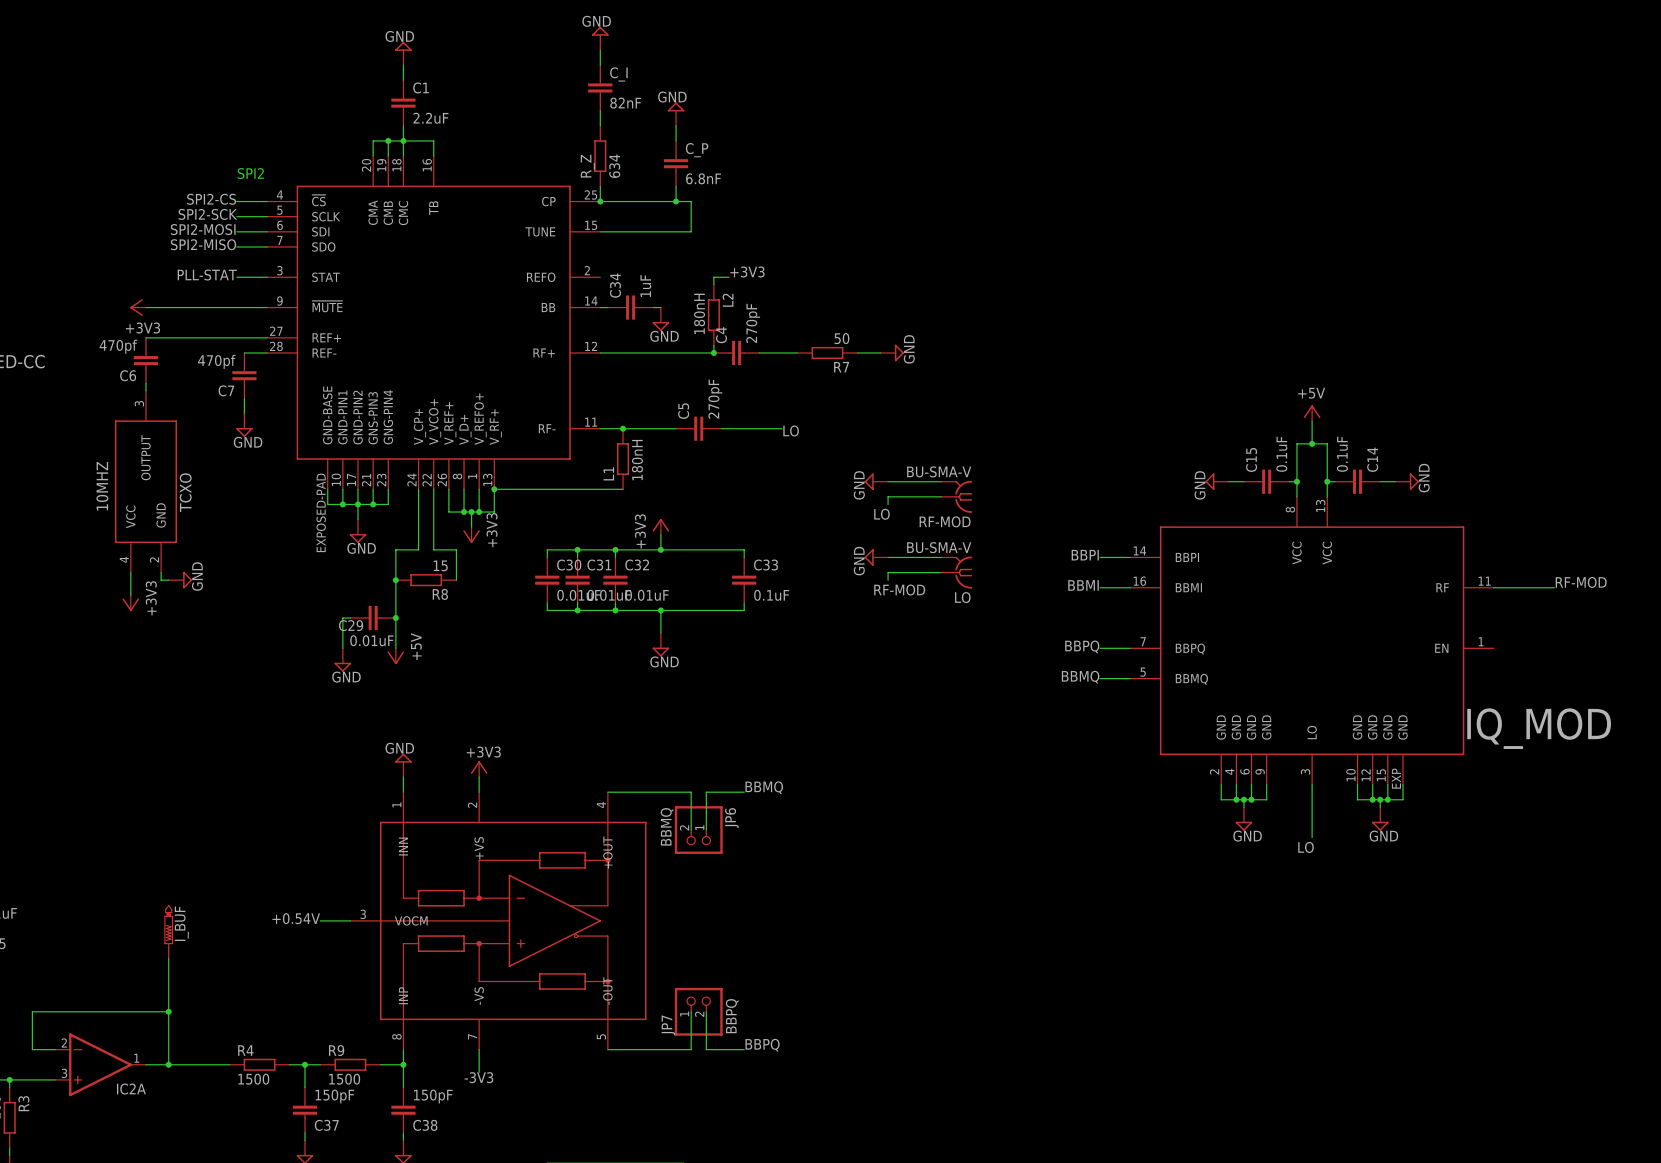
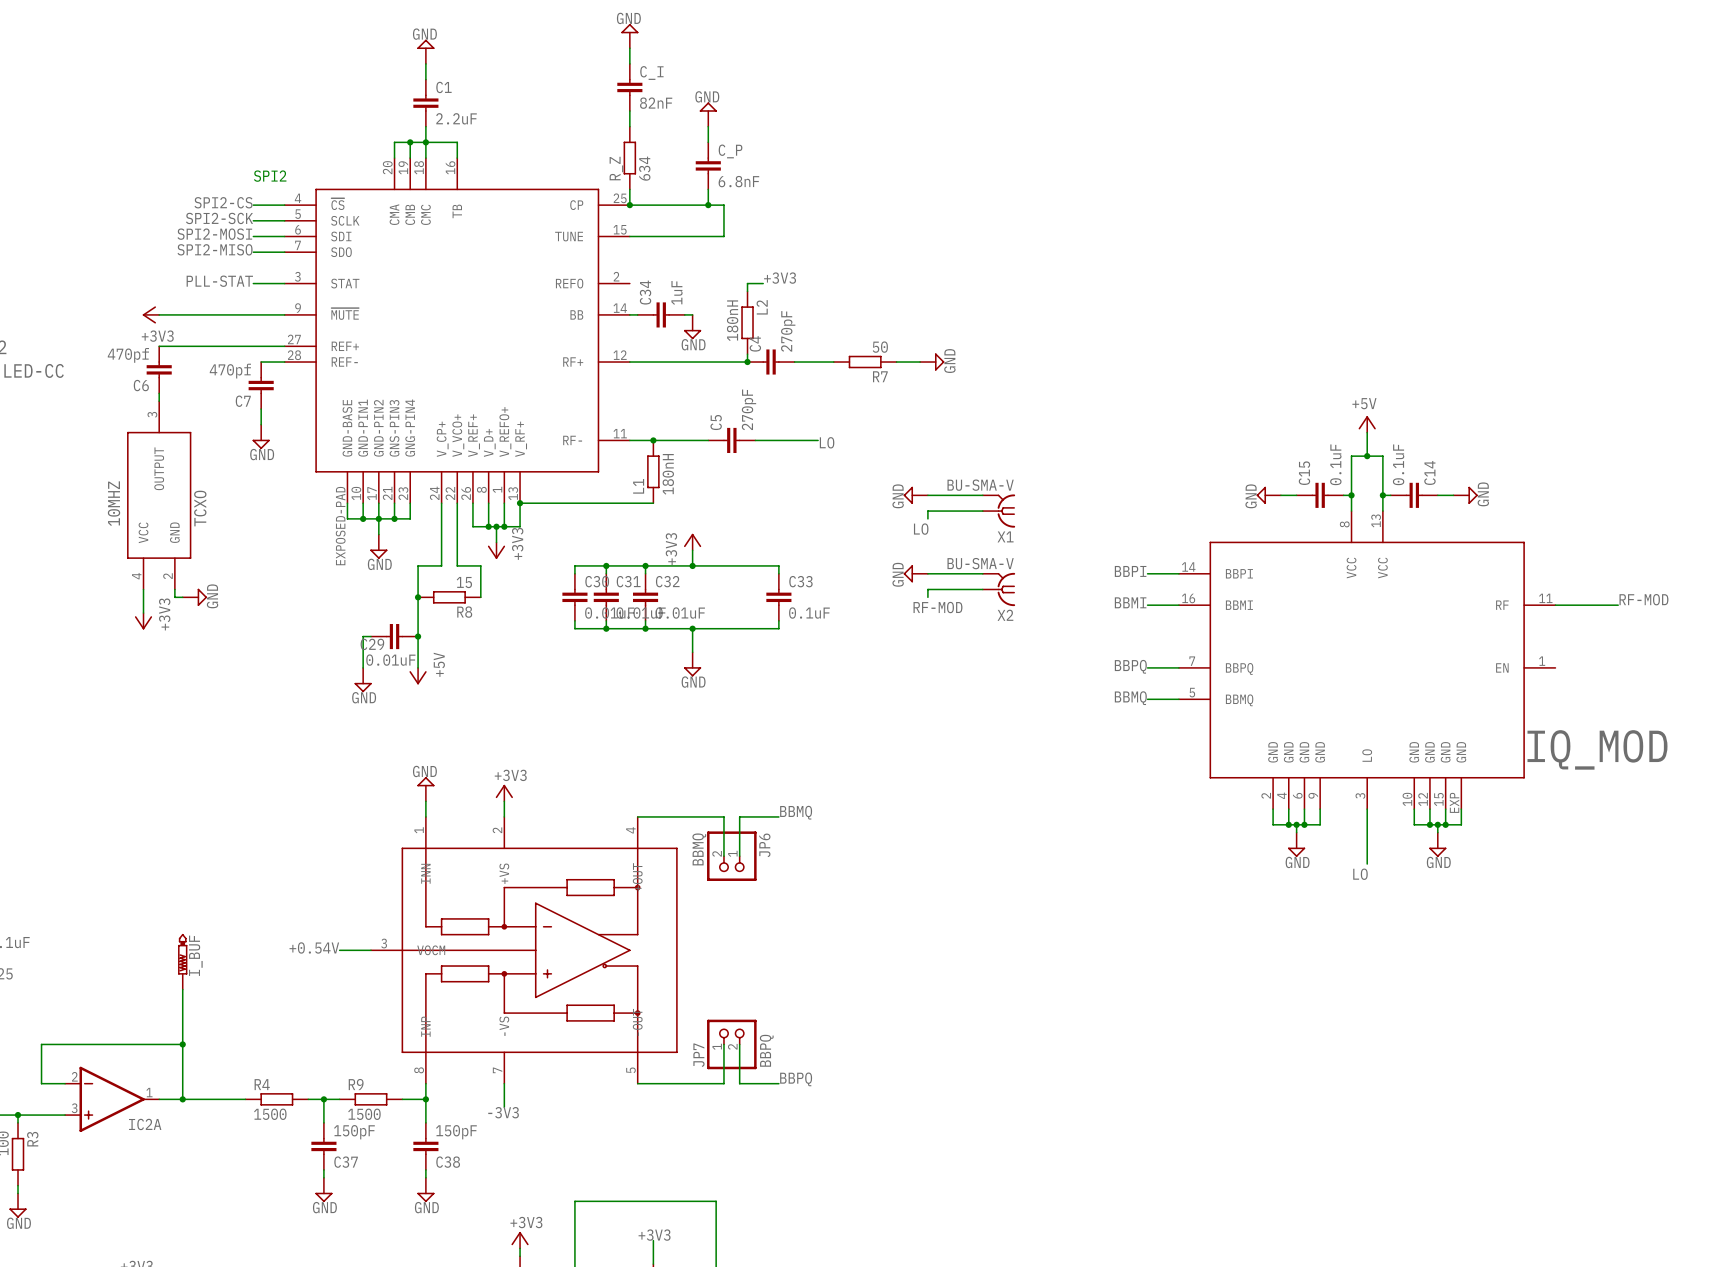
RF-MOD name: RF-MOD (945, 521) -> X1 (1005, 536)
LO name: LO (962, 597) -> X2 (1005, 615)

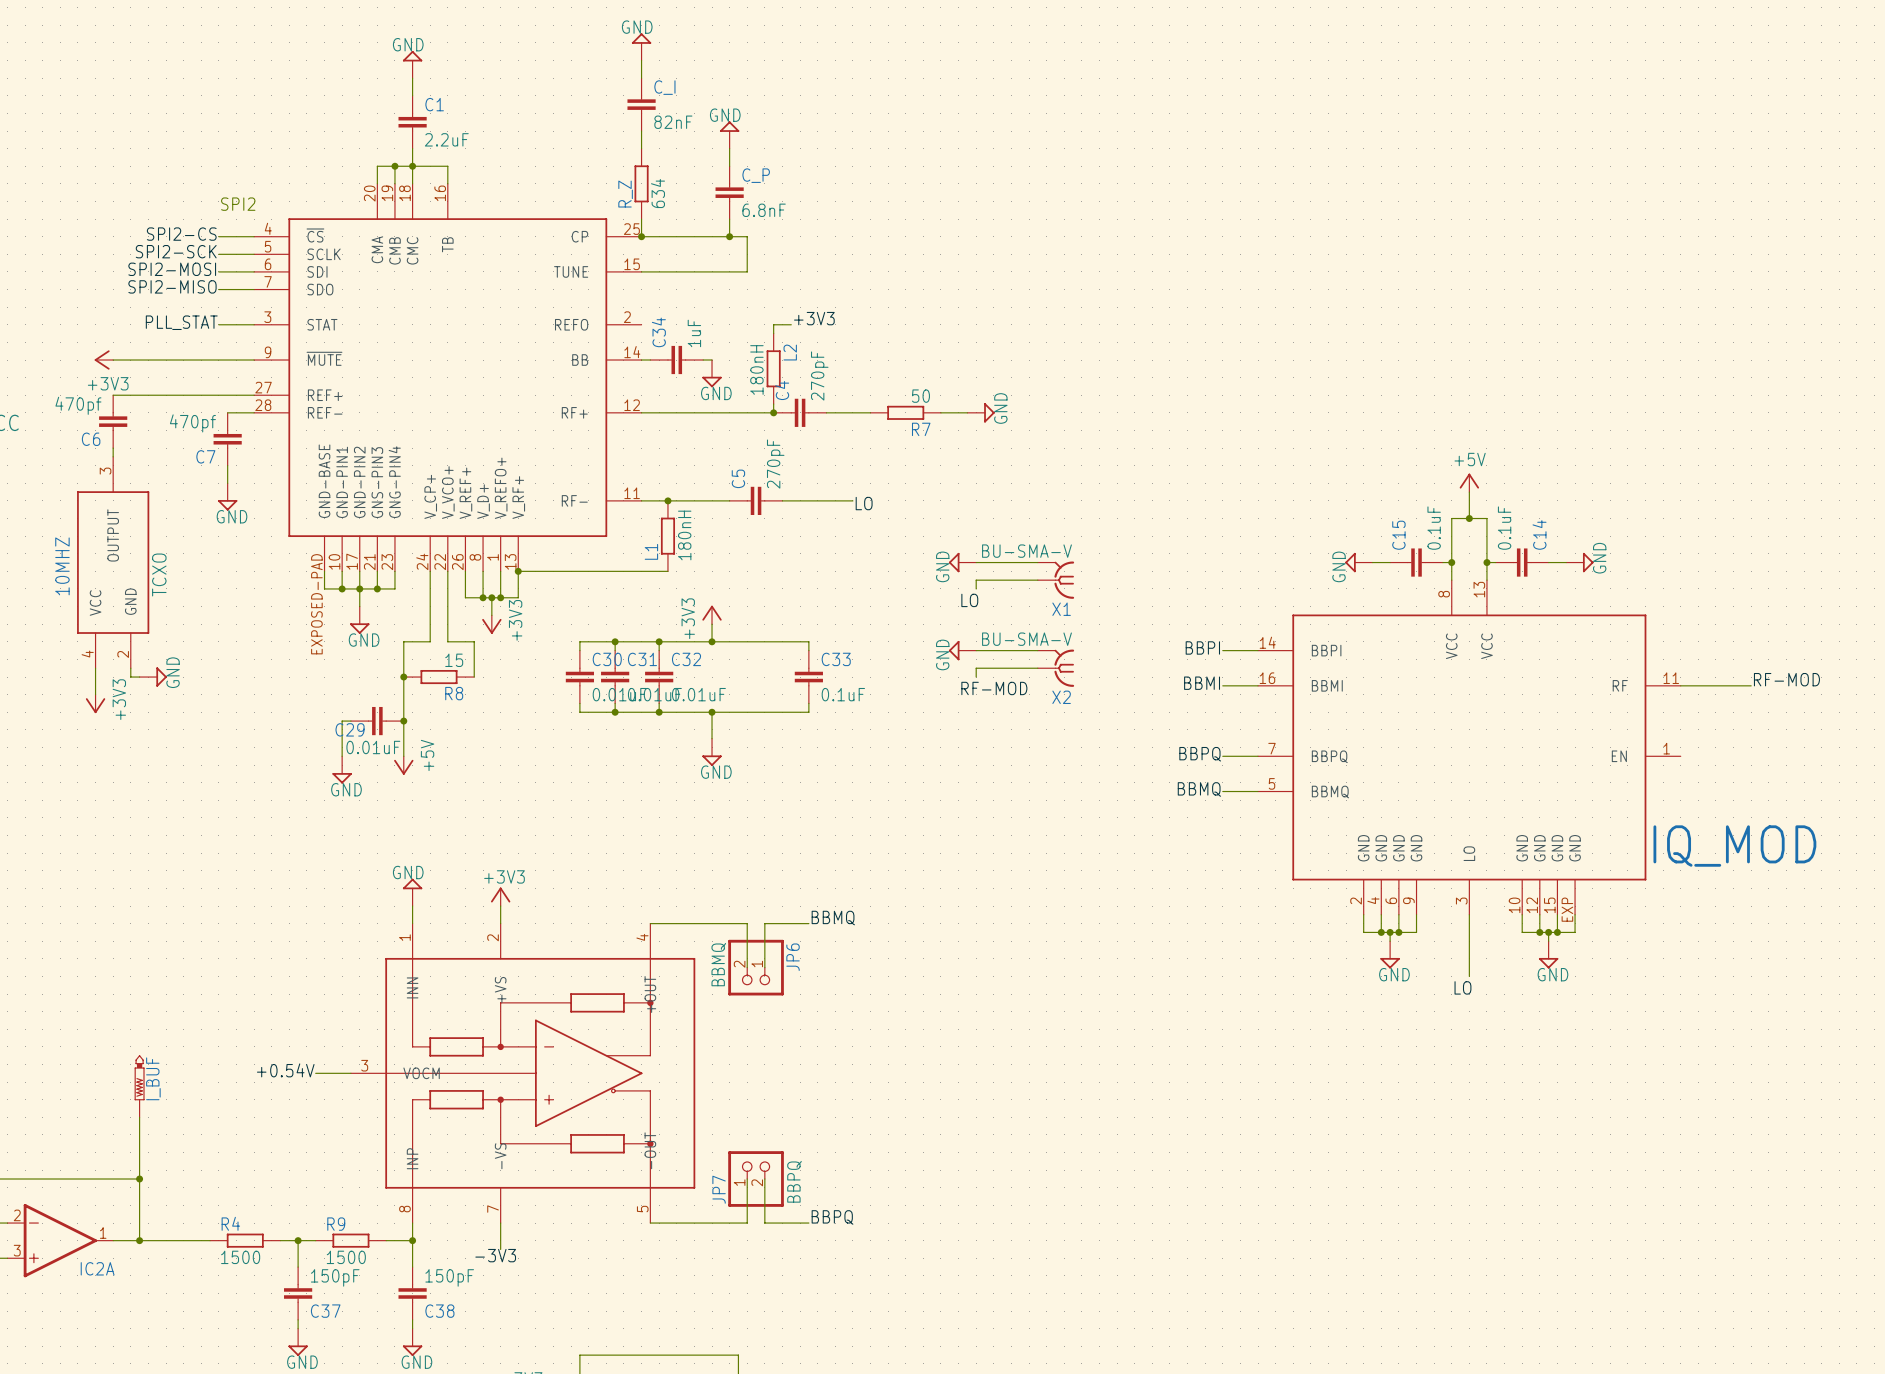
label: PLL-STAT (219, 281) -> PLL_STAT (181, 322)

